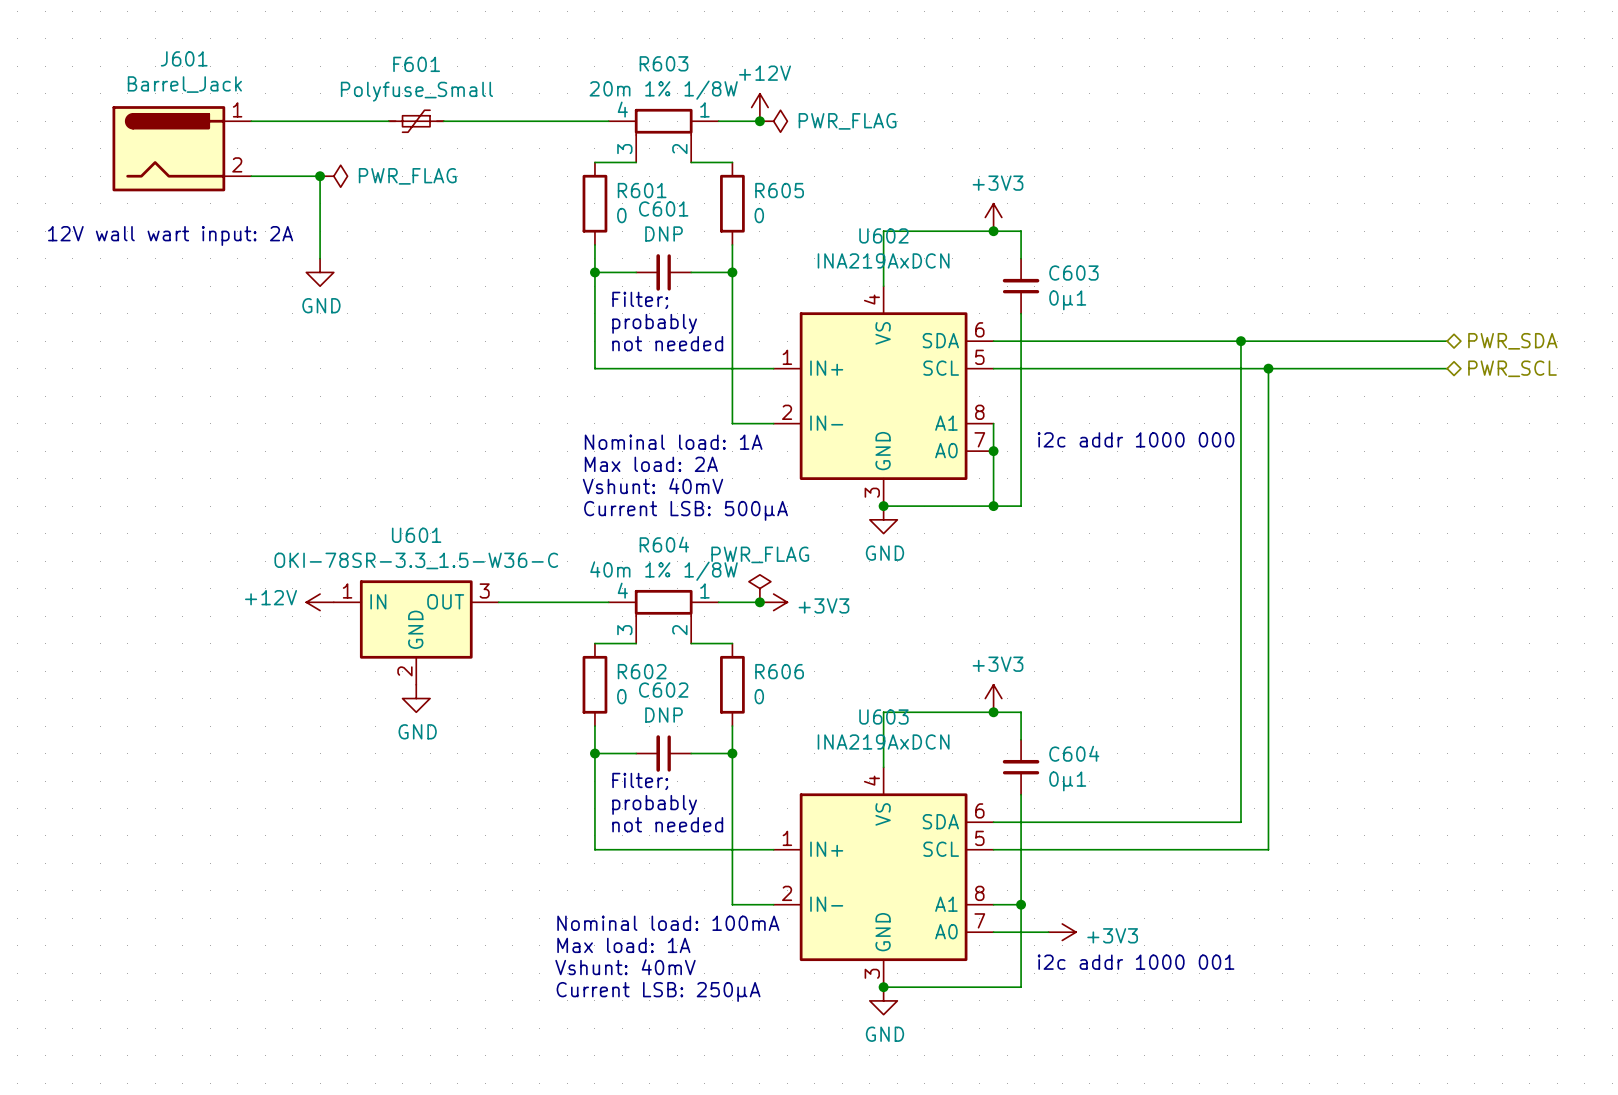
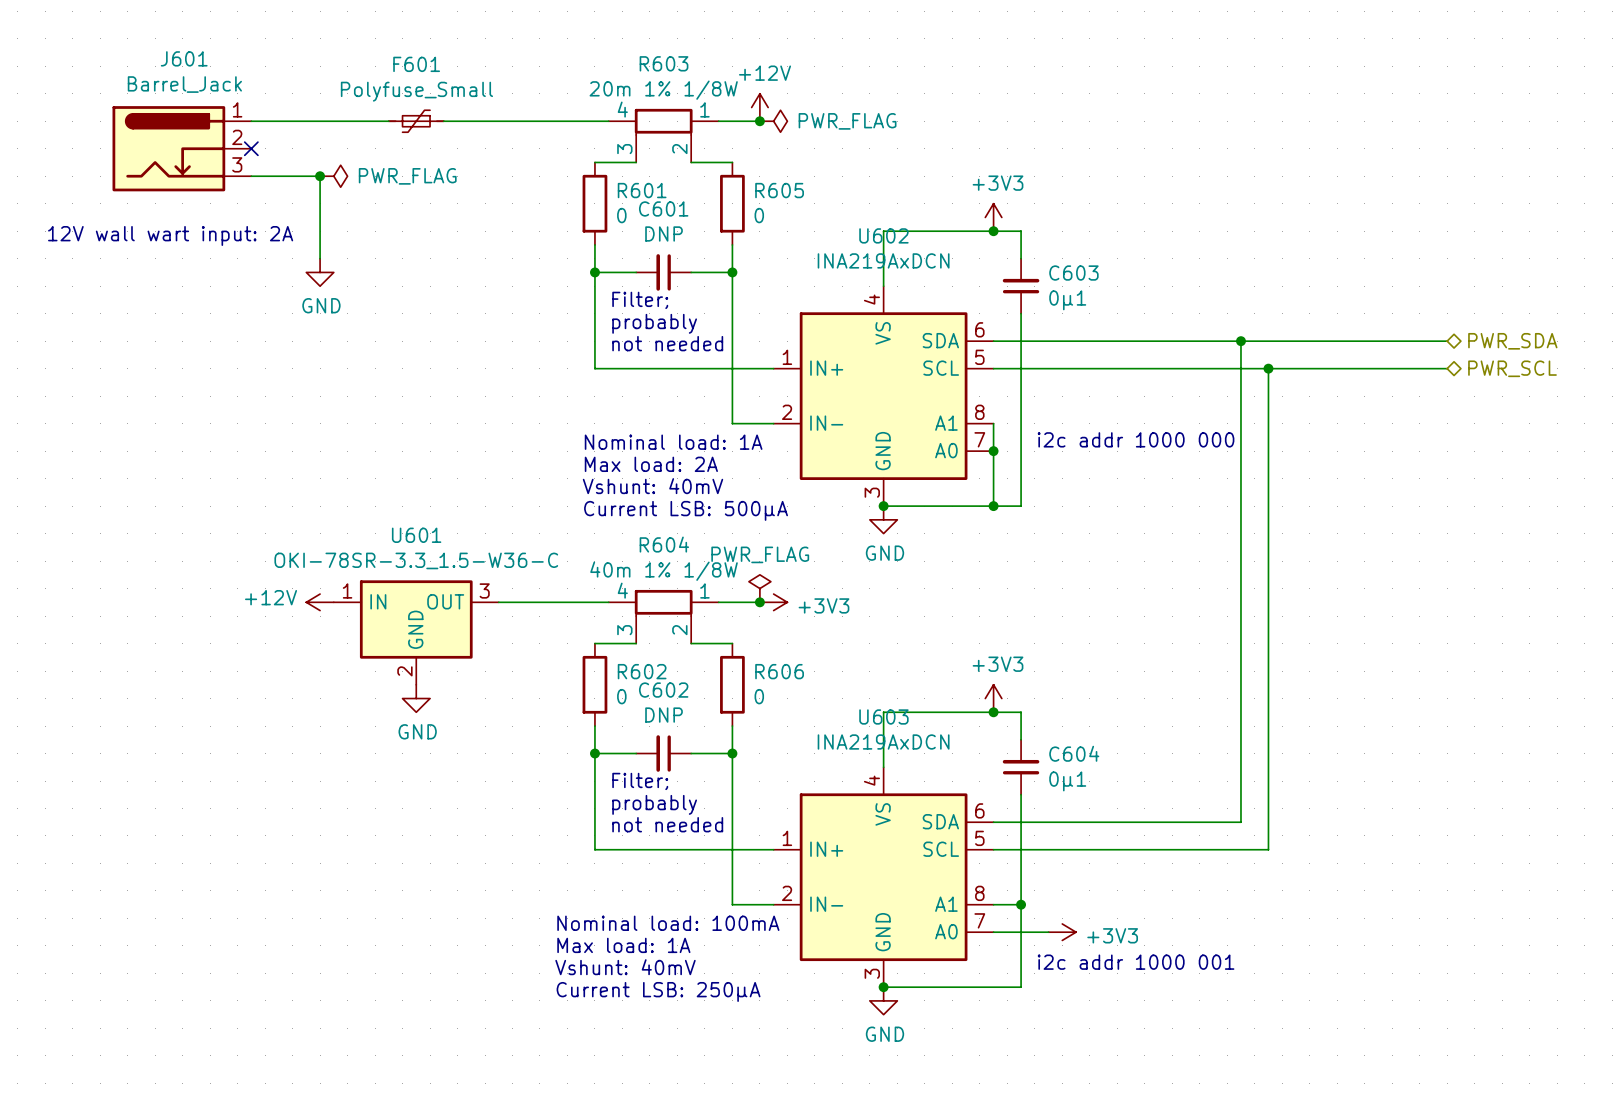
J601 symbol: [112, 106, 252, 192] -> [112, 106, 252, 192]
no-connect mark: none -> (251, 148)

